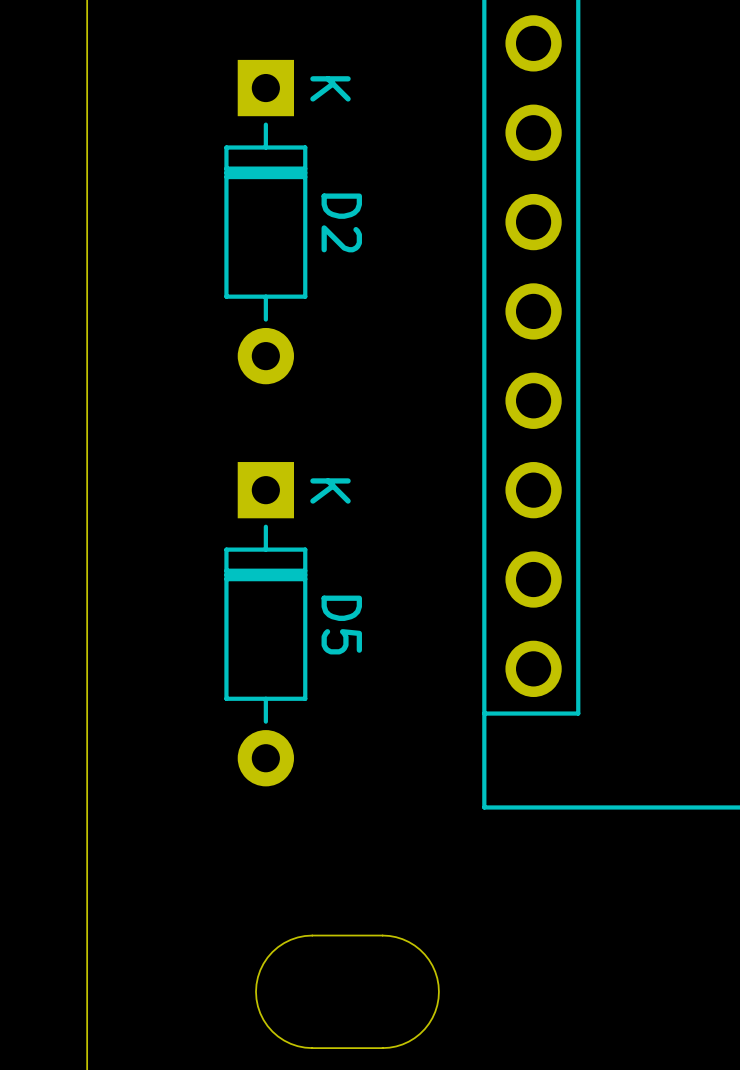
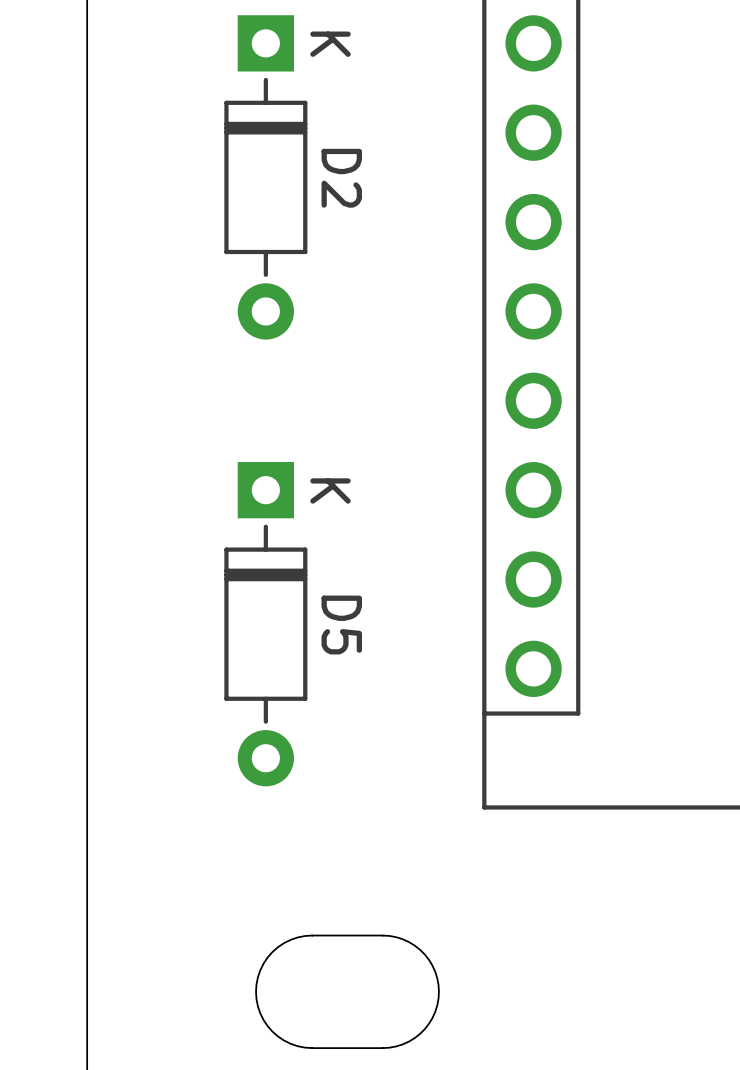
D2 position: (265, 222) -> (265, 177)

